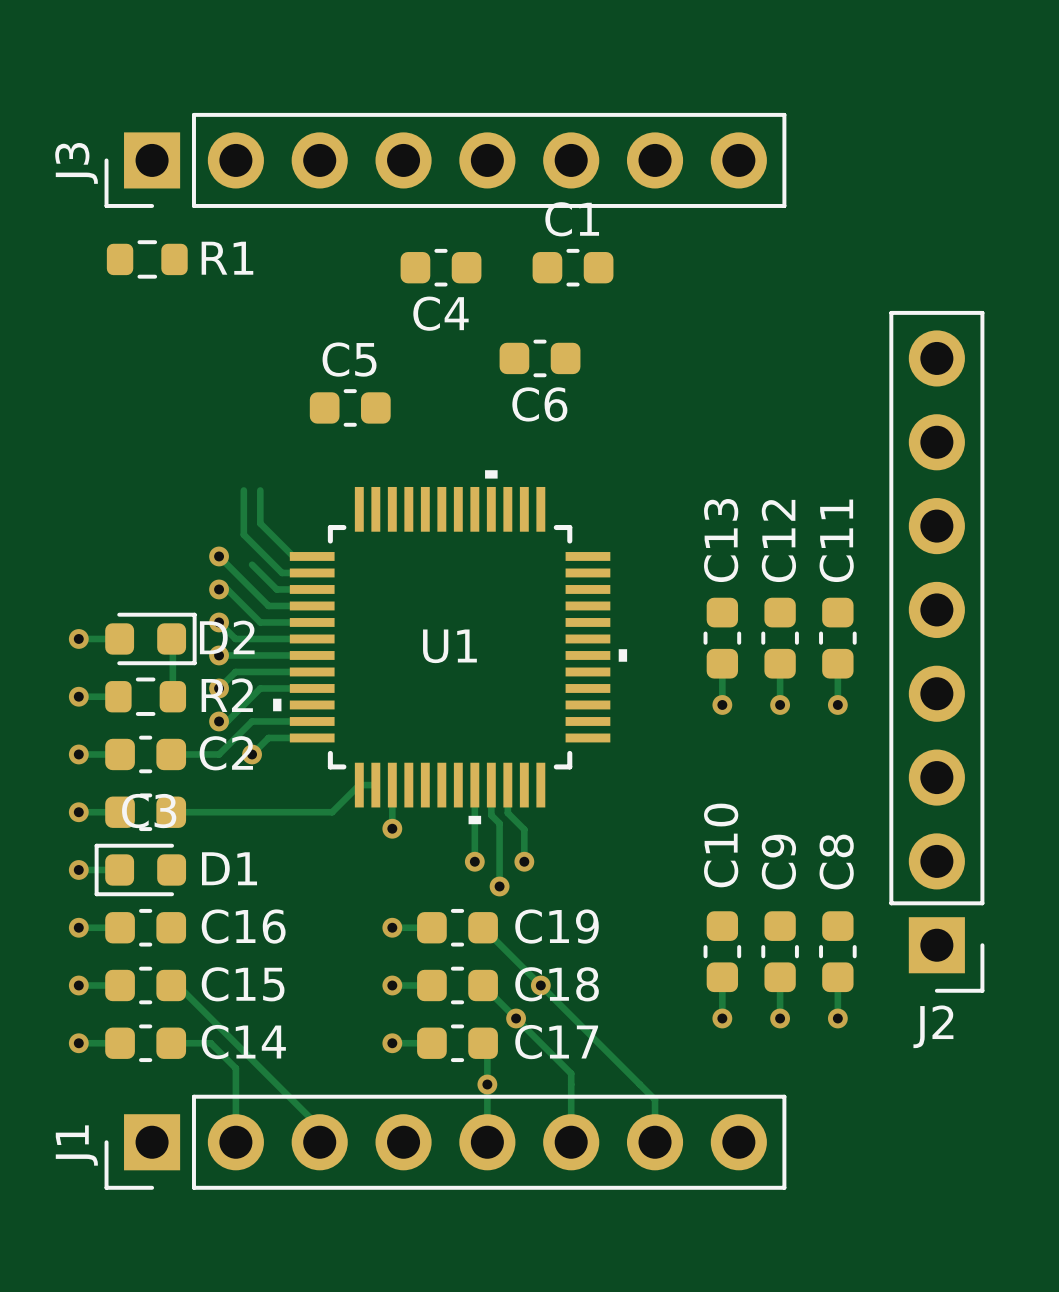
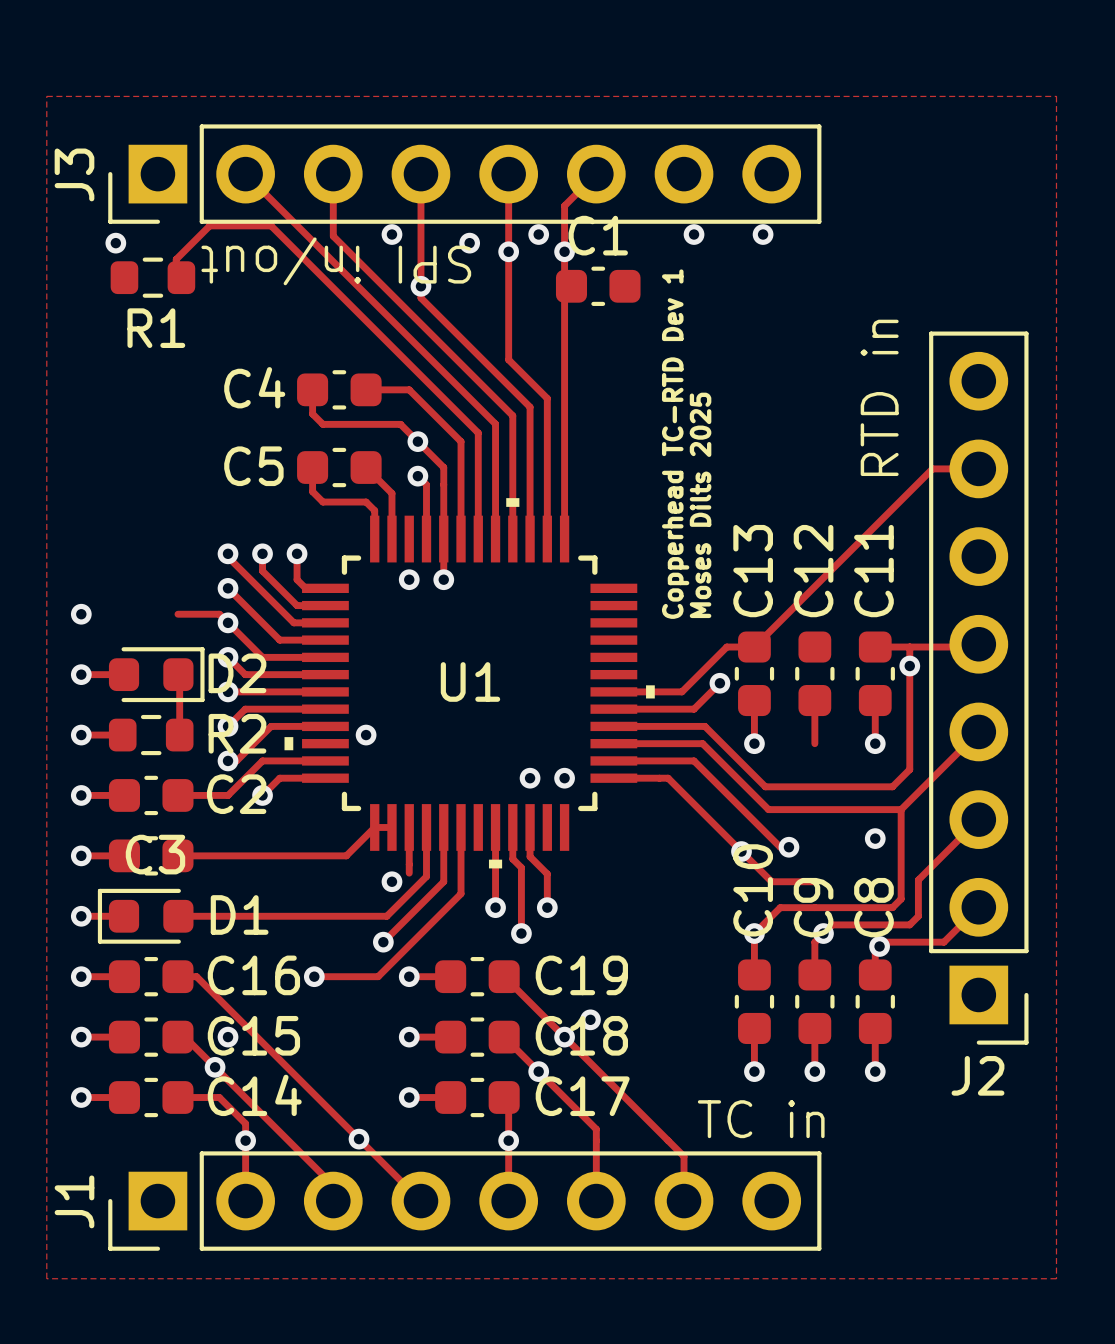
zone outline: none -> (46, 96) (1056, 96) (1056, 1278) (46, 1278) (46, 96)
track: none -> (245, 174) (495, 424) (495, 539)
track: none -> (333, 174) (333, 236) (512, 415) (512, 539)
track: none -> (420, 174) (420, 298) (530, 407) (530, 539)
track: none -> (508, 174) (508, 359) (547, 398) (547, 539)
track: none -> (596, 174) (564, 205) (564, 539)
via: none -> (391, 234)
via: none -> (538, 234)
via: none -> (694, 234)
via: none -> (763, 234)
via: none -> (115, 243)
via: none -> (469, 243)
via: none -> (508, 251)
via: none -> (564, 251)
text: none -> SPI in/out (336, 261)
R1 name position: R1 (227, 258) -> R1 (156, 328)
track: none -> (176, 277) (176, 259) (209, 225) (271, 225) (478, 433) (478, 539)
via: none -> (420, 286)
C4 position: (441, 267) -> (339, 389)
C4 name position: C4 (441, 313) -> C4 (254, 387)
C6: (540, 358) -> none
C5 name position: C5 (349, 359) -> C5 (253, 466)
track: none -> (312, 389) (312, 414) (322, 424) (400, 424) (443, 467) (443, 579)
track: none -> (366, 389) (409, 389) (461, 441) (461, 539)
text: none -> RTD in (879, 397)
C5 position: (350, 407) -> (339, 467)
via: none -> (417, 441)
text: none -> Copperhead TC-RTD Dev 1 (675, 444)
track: none -> (312, 467) (312, 491) (322, 502) (366, 502) (374, 510) (374, 539)
track: none -> (366, 467) (391, 493) (391, 539)
track: none -> (978, 468) (932, 468) (754, 647) (726, 647) (681, 691) (613, 691)
track: none -> (417, 476) (426, 484) (426, 539)
via: none -> (417, 476)
text: none -> Moses Dilts 2025 (700, 505)
track: (243, 490) (243, 534) (282, 572) (285, 572) -> (262, 553) (262, 571) (297, 605)
track: (260, 490) (260, 523) (285, 548) -> (297, 553) (297, 579)
via: none -> (228, 553)
via: none -> (262, 553)
via: none -> (297, 553)
via: none -> (409, 579)
via: none -> (443, 579)
track: (252, 564) (276, 589) (282, 589) -> (228, 553) (228, 557) (293, 622)
via: none -> (81, 614)
track: (219, 589) (227, 589) (260, 622) -> (177, 614) (219, 614) (262, 657) (271, 657)
track: none -> (978, 644) (976, 647) (875, 647)
track: none -> (909, 647) (909, 769) (892, 786) (765, 786) (704, 726) (613, 726)
via: none -> (909, 666)
track: none -> (719, 683) (694, 709) (613, 709)
via: none -> (719, 683)
track: none -> (978, 731) (901, 809)
via: none -> (366, 735)
track: none -> (613, 743) (702, 743) (768, 809) (901, 809)
via: (780, 704) -> none
track: none -> (613, 760) (694, 760) (780, 847) (788, 847)
via: none -> (530, 778)
via: none -> (564, 778)
track: none -> (613, 778) (668, 778) (771, 881) (814, 881)
track: none -> (901, 809) (901, 899) (892, 907) (780, 907) (754, 933) (754, 974)
track: none -> (978, 819) (918, 880) (918, 916) (909, 924) (832, 924) (814, 942) (814, 974)
track: none -> (426, 827) (426, 876) (386, 916) (178, 916)
track: none -> (443, 827) (443, 881) (383, 942)
track: none -> (461, 827) (461, 893) (378, 976) (314, 976)
via: none -> (875, 838)
via: none -> (788, 847)
via: none -> (741, 851)
via position: (392, 828) -> (391, 881)
track: none -> (978, 907) (943, 942) (883, 942) (875, 950) (875, 974)
via: none -> (754, 933)
via: none -> (823, 933)
via: none -> (383, 942)
via: none -> (879, 946)
track: none -> (177, 976) (196, 976) (420, 1201)
via: none -> (314, 976)
via: none -> (590, 1019)
via: none -> (228, 1037)
via: none -> (215, 1067)
text: none -> TC in (761, 1119)
via: none -> (359, 1139)
via: none -> (245, 1140)

